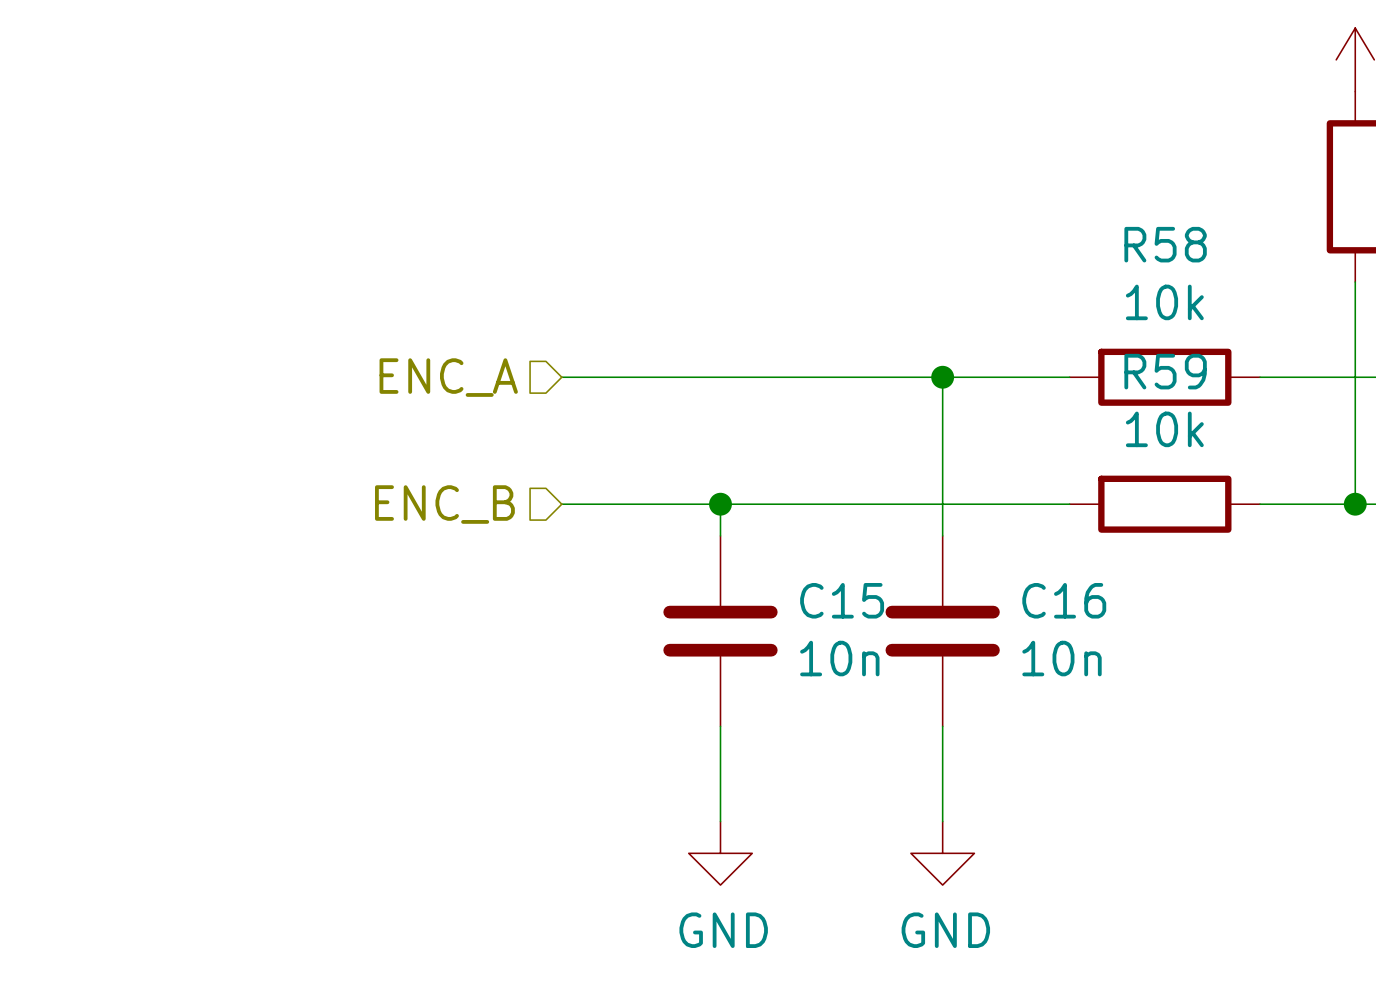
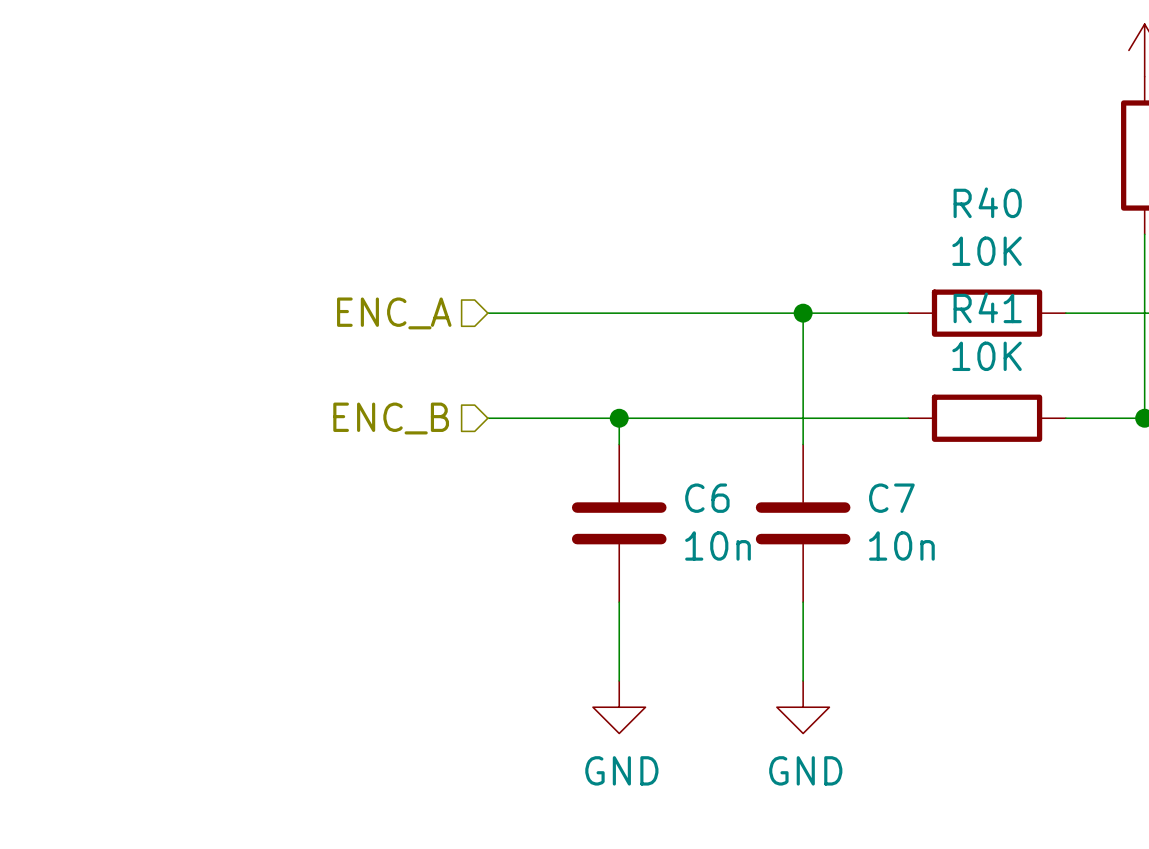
R58 name: R58 (1165, 244) -> R40 (987, 202)
R58 value: 10k (1164, 302) -> 10K (987, 251)
R59 name: R59 (1165, 371) -> R41 (987, 307)
R59 value: 10k (1164, 429) -> 10K (987, 356)
C15 name: C15 (842, 600) -> C6 (707, 498)
C16 name: C16 (1064, 600) -> C7 (891, 498)

